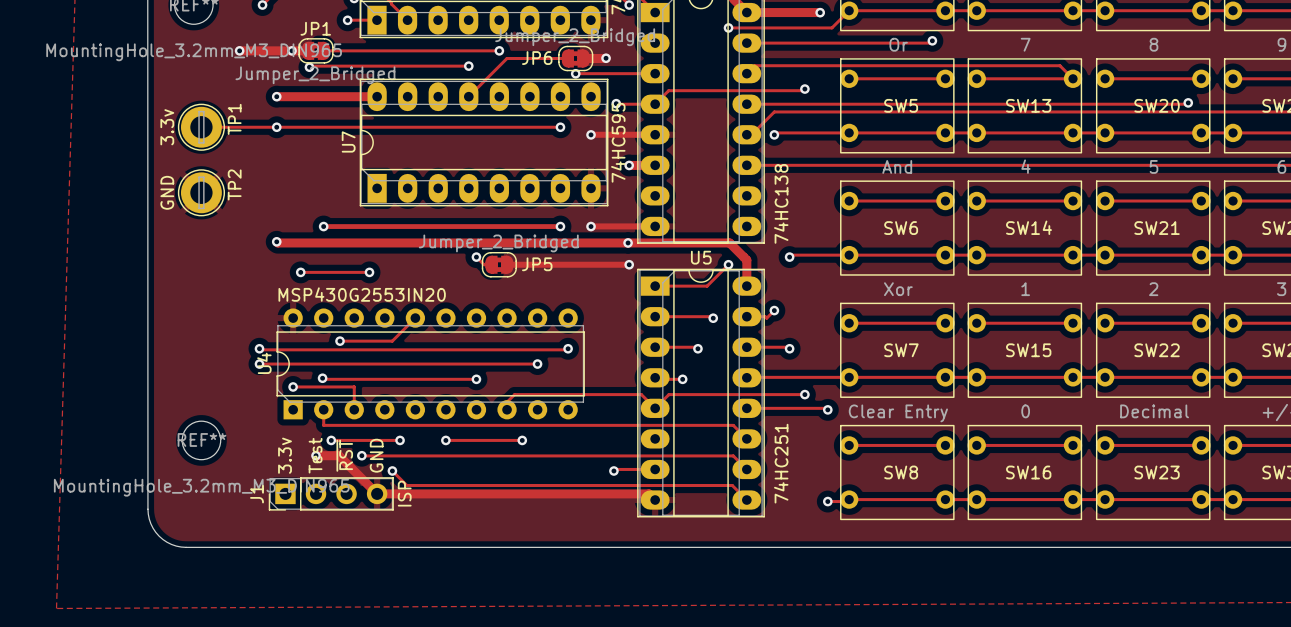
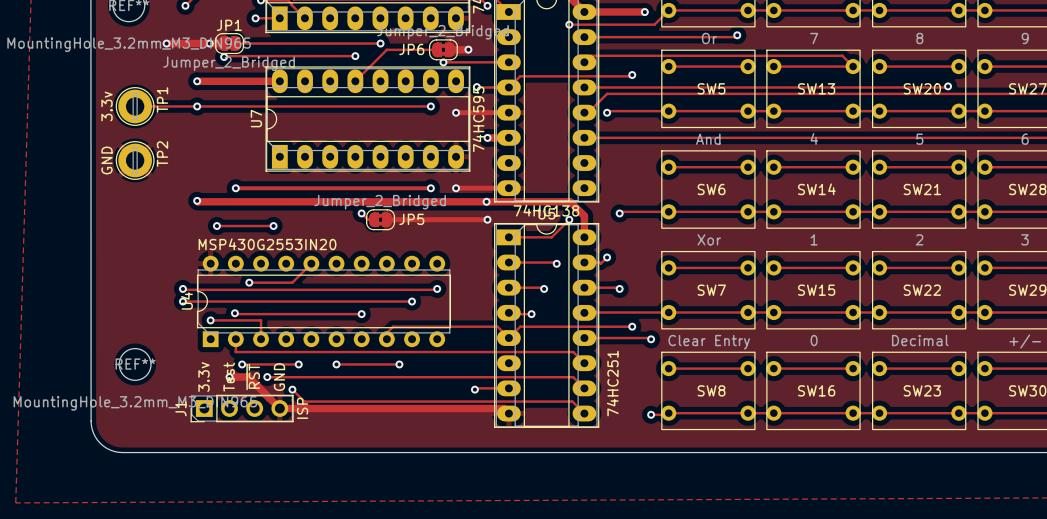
part value rotation: 0° (781, 203) -> 90° clockwise (546, 210)
part value position: 74HC138 (781, 203) -> 74HC138 (546, 210)

